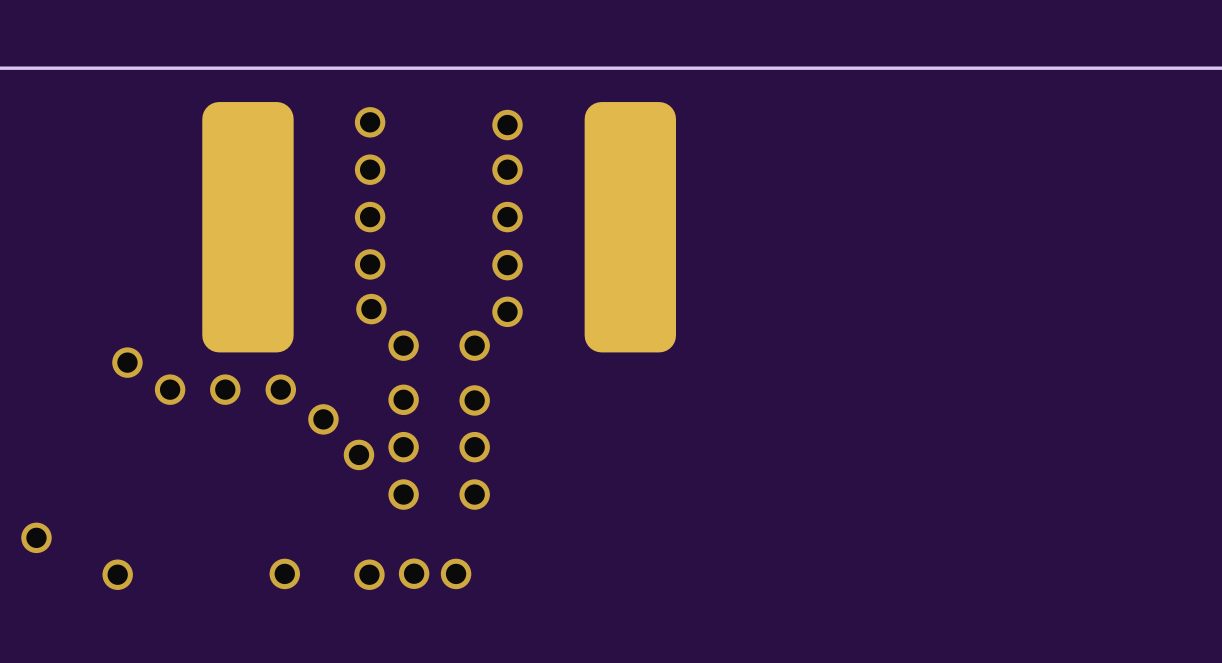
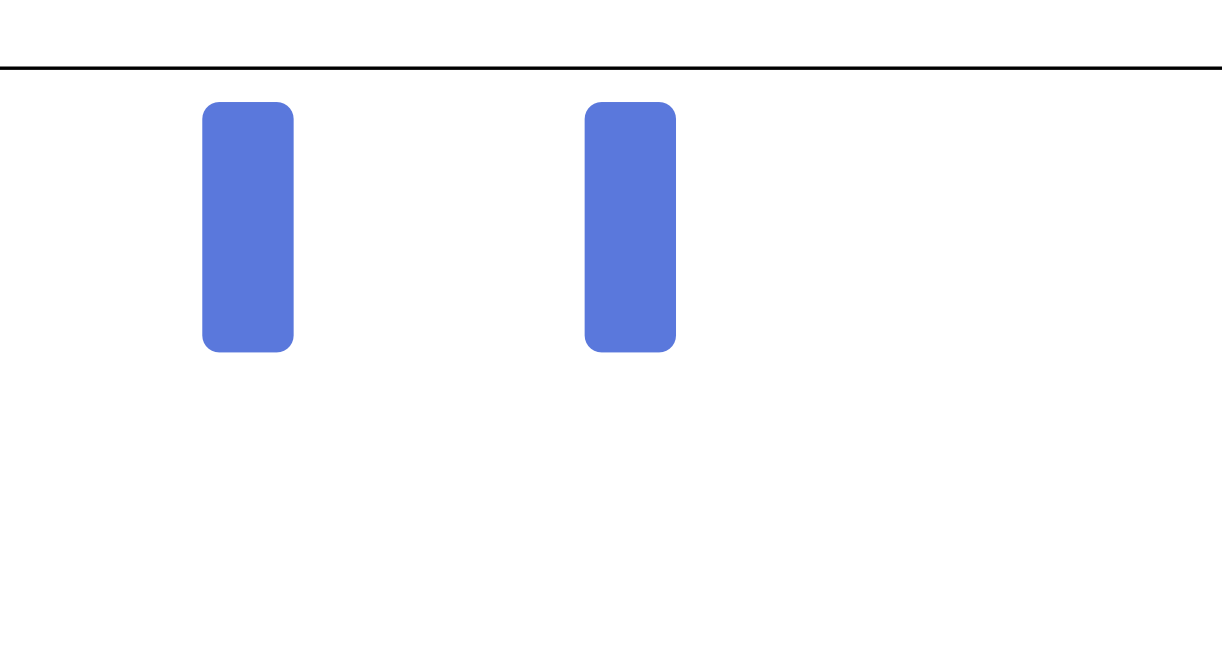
via: (370, 122) -> none
via: (507, 125) -> none
via: (370, 169) -> none
via: (507, 169) -> none
via: (370, 217) -> none
via: (507, 217) -> none
via: (370, 264) -> none
via: (507, 265) -> none
via: (371, 309) -> none
via: (507, 311) -> none
via: (403, 345) -> none
via: (474, 345) -> none
via: (127, 362) -> none
via: (170, 389) -> none
via: (225, 389) -> none
via: (280, 389) -> none
via: (403, 399) -> none
via: (474, 400) -> none
via: (323, 419) -> none
via: (403, 447) -> none
via: (474, 447) -> none
via: (358, 454) -> none
via: (403, 494) -> none
via: (474, 494) -> none
via: (36, 537) -> none
via: (284, 573) -> none
via: (414, 573) -> none
via: (456, 573) -> none
via: (117, 574) -> none
via: (369, 574) -> none

